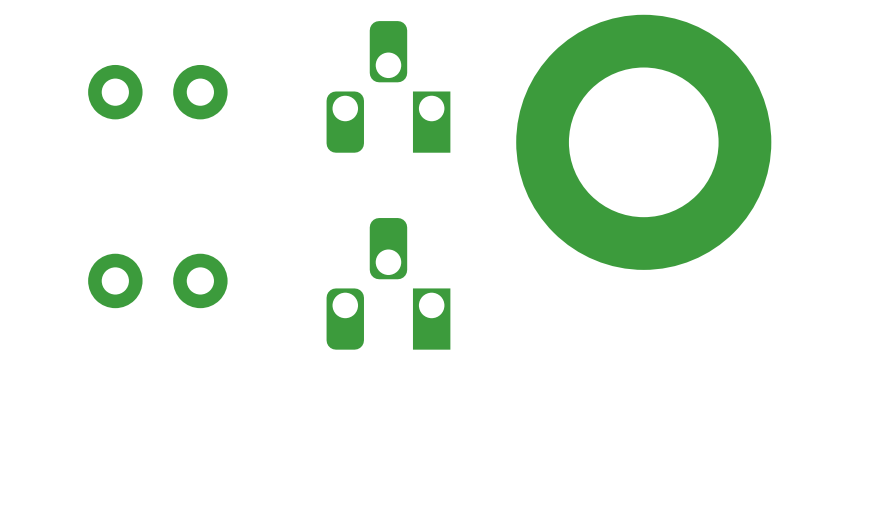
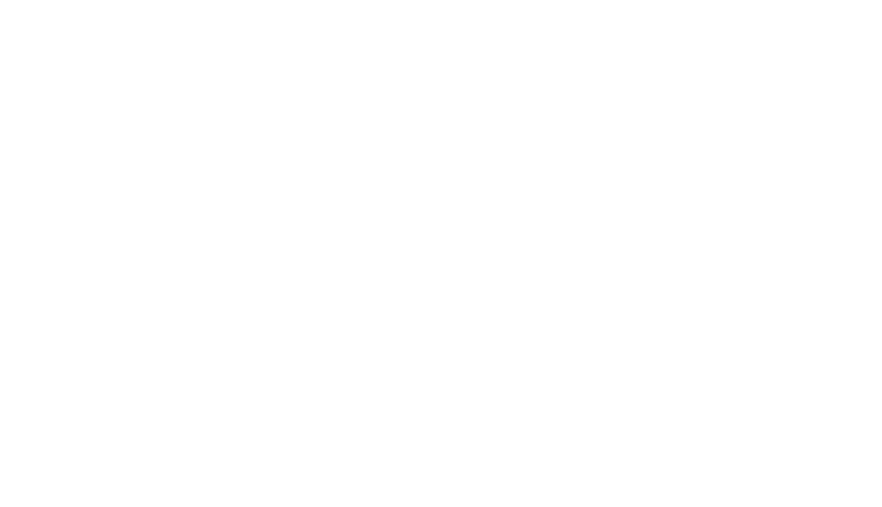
part: (388, 86) -> none
part: (157, 92) -> none
part: (643, 142) -> none
part: (157, 280) -> none
part: (388, 283) -> none

